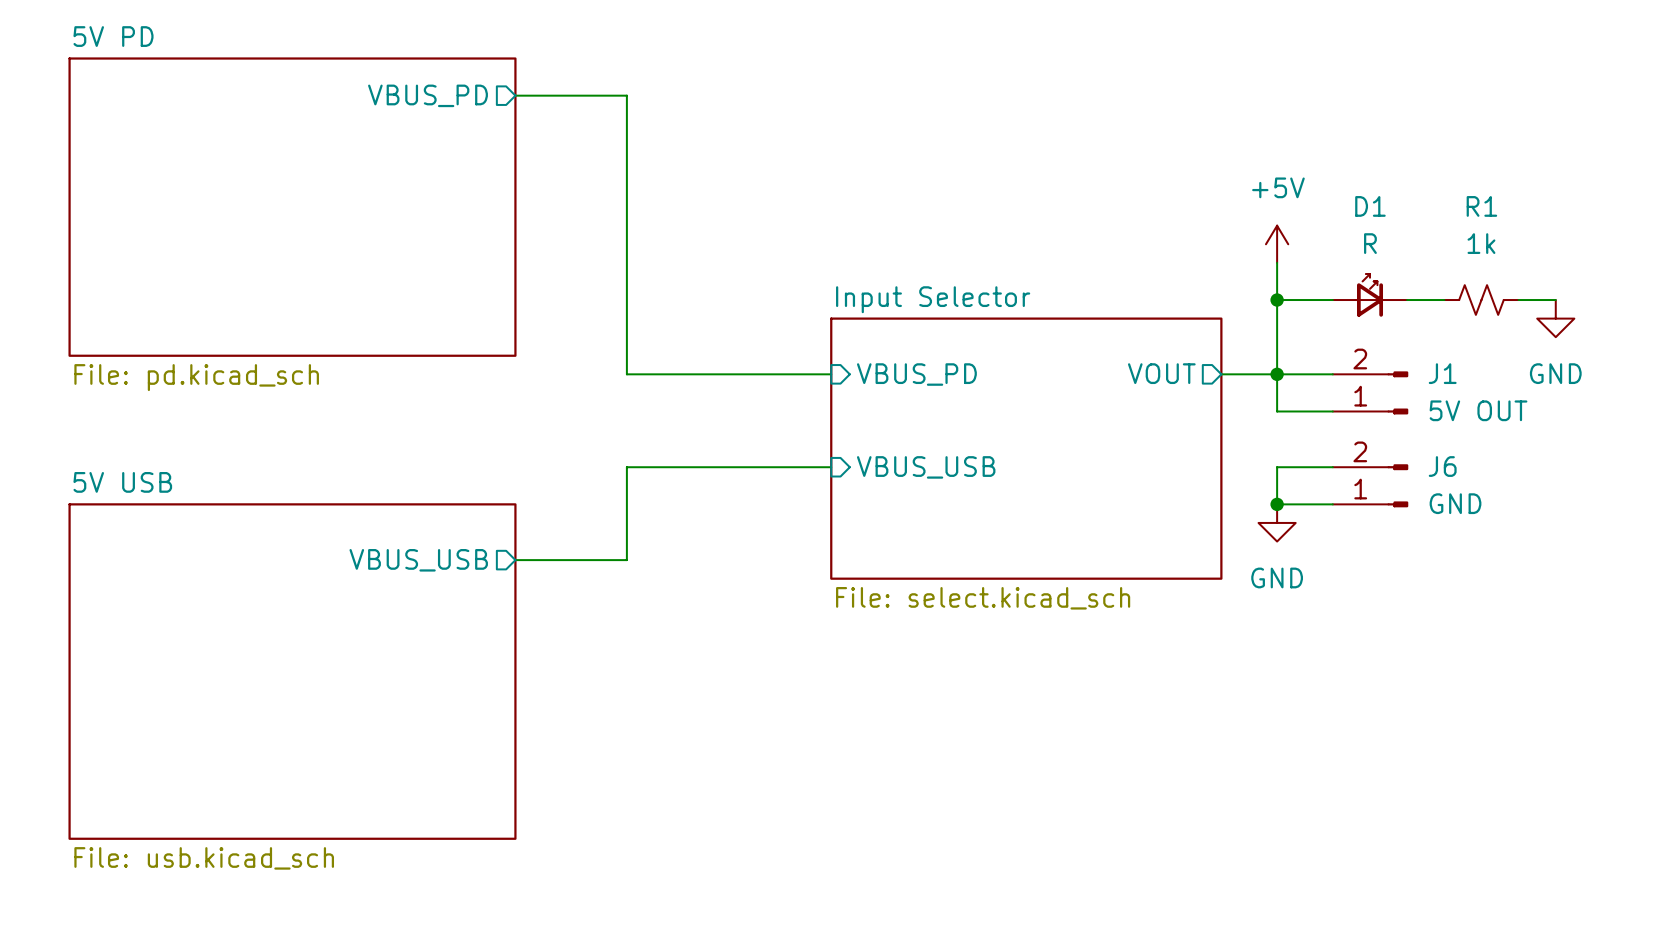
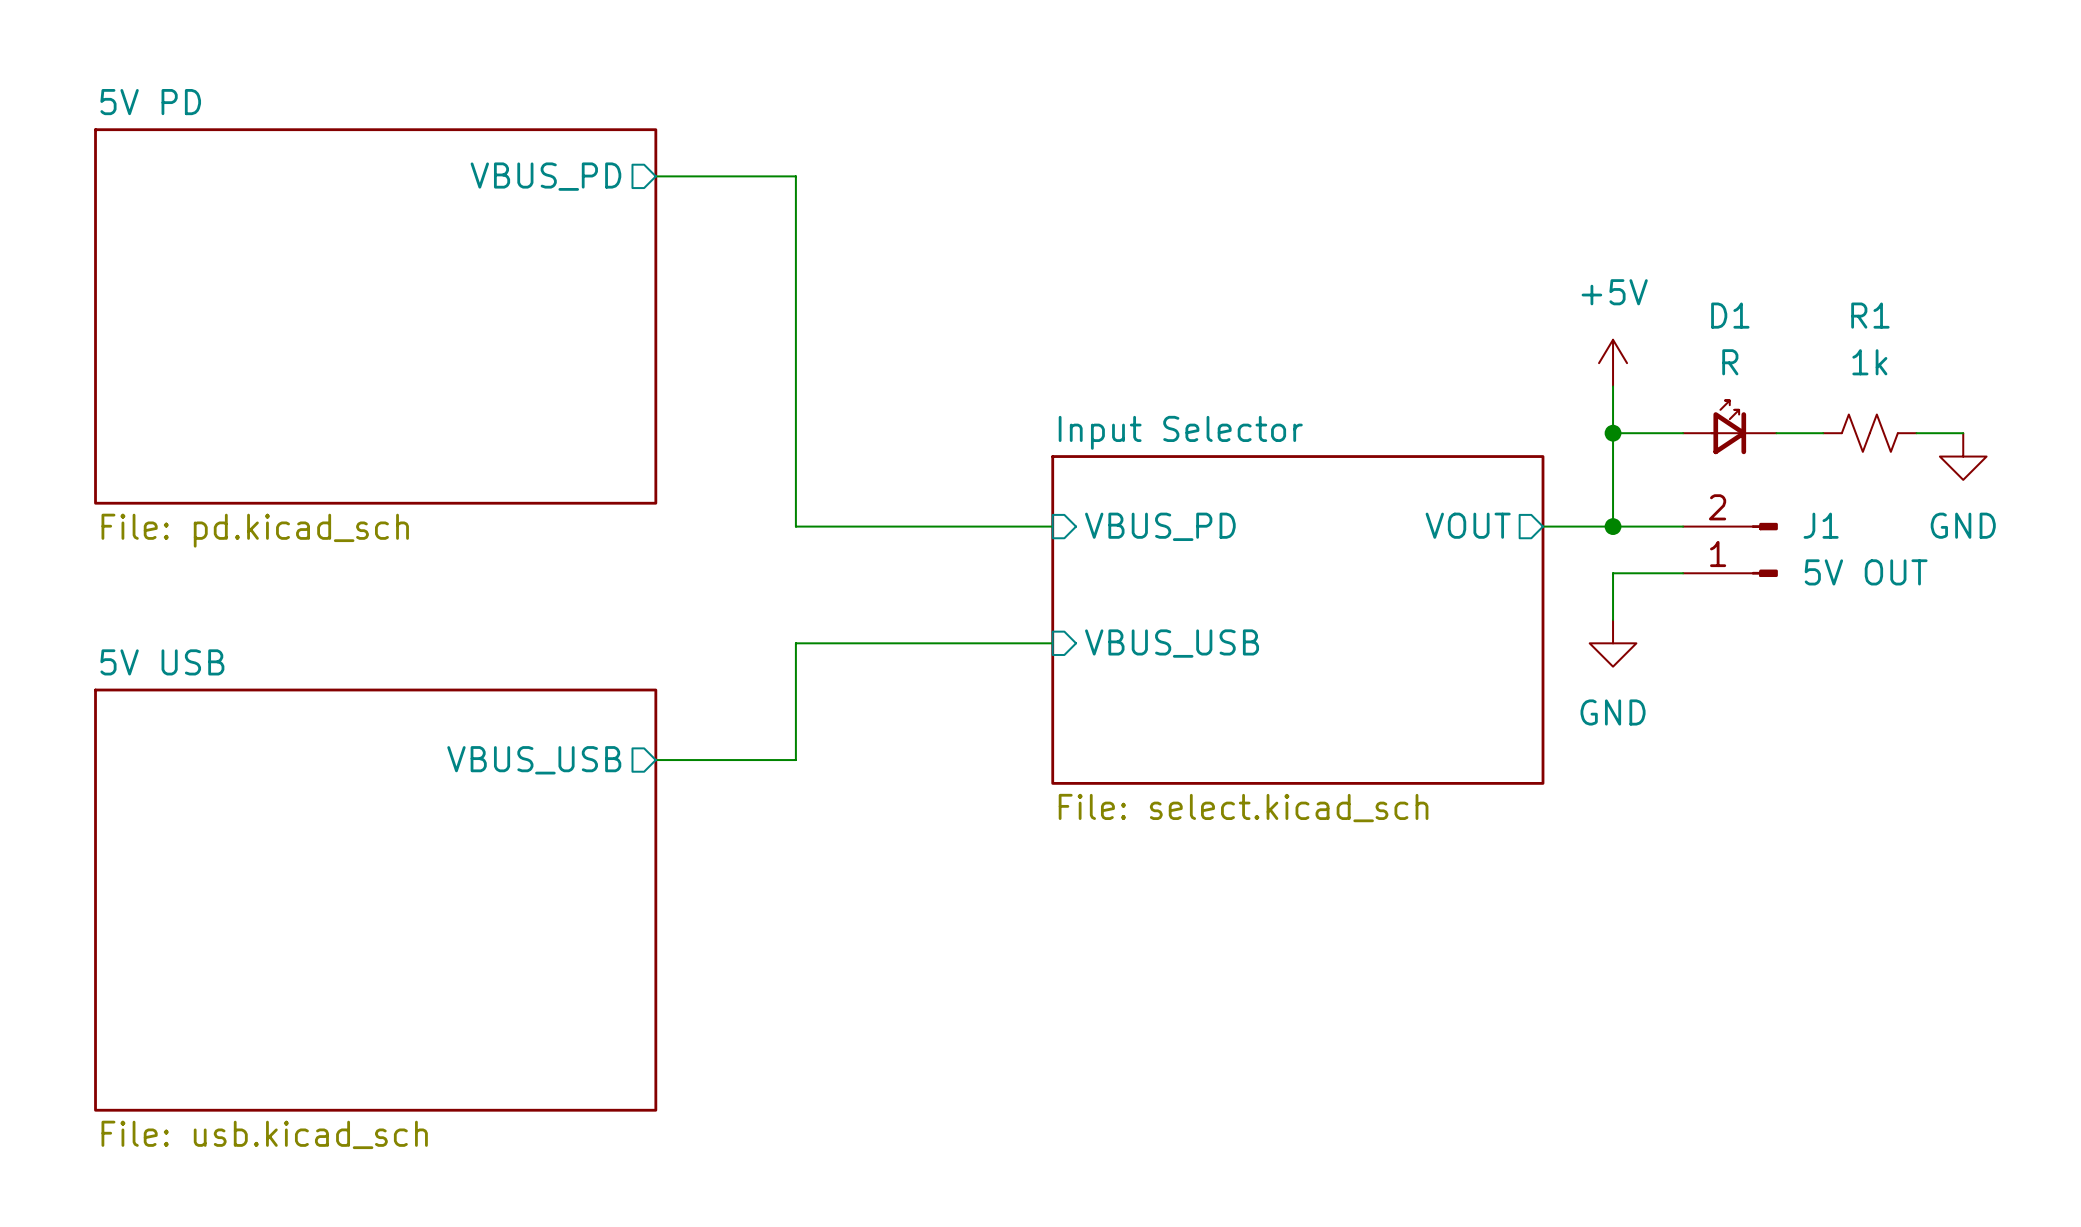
wire: (1277, 374) (1277, 411) -> (1613, 619) (1613, 573)
wire: (1332, 467) (1277, 467) (1277, 504) (1332, 504) -> none
J6: GND (1370, 485) -> none
junction: (1277, 504) -> none
power symbol position: GND (1277, 522) -> GND (1613, 643)

